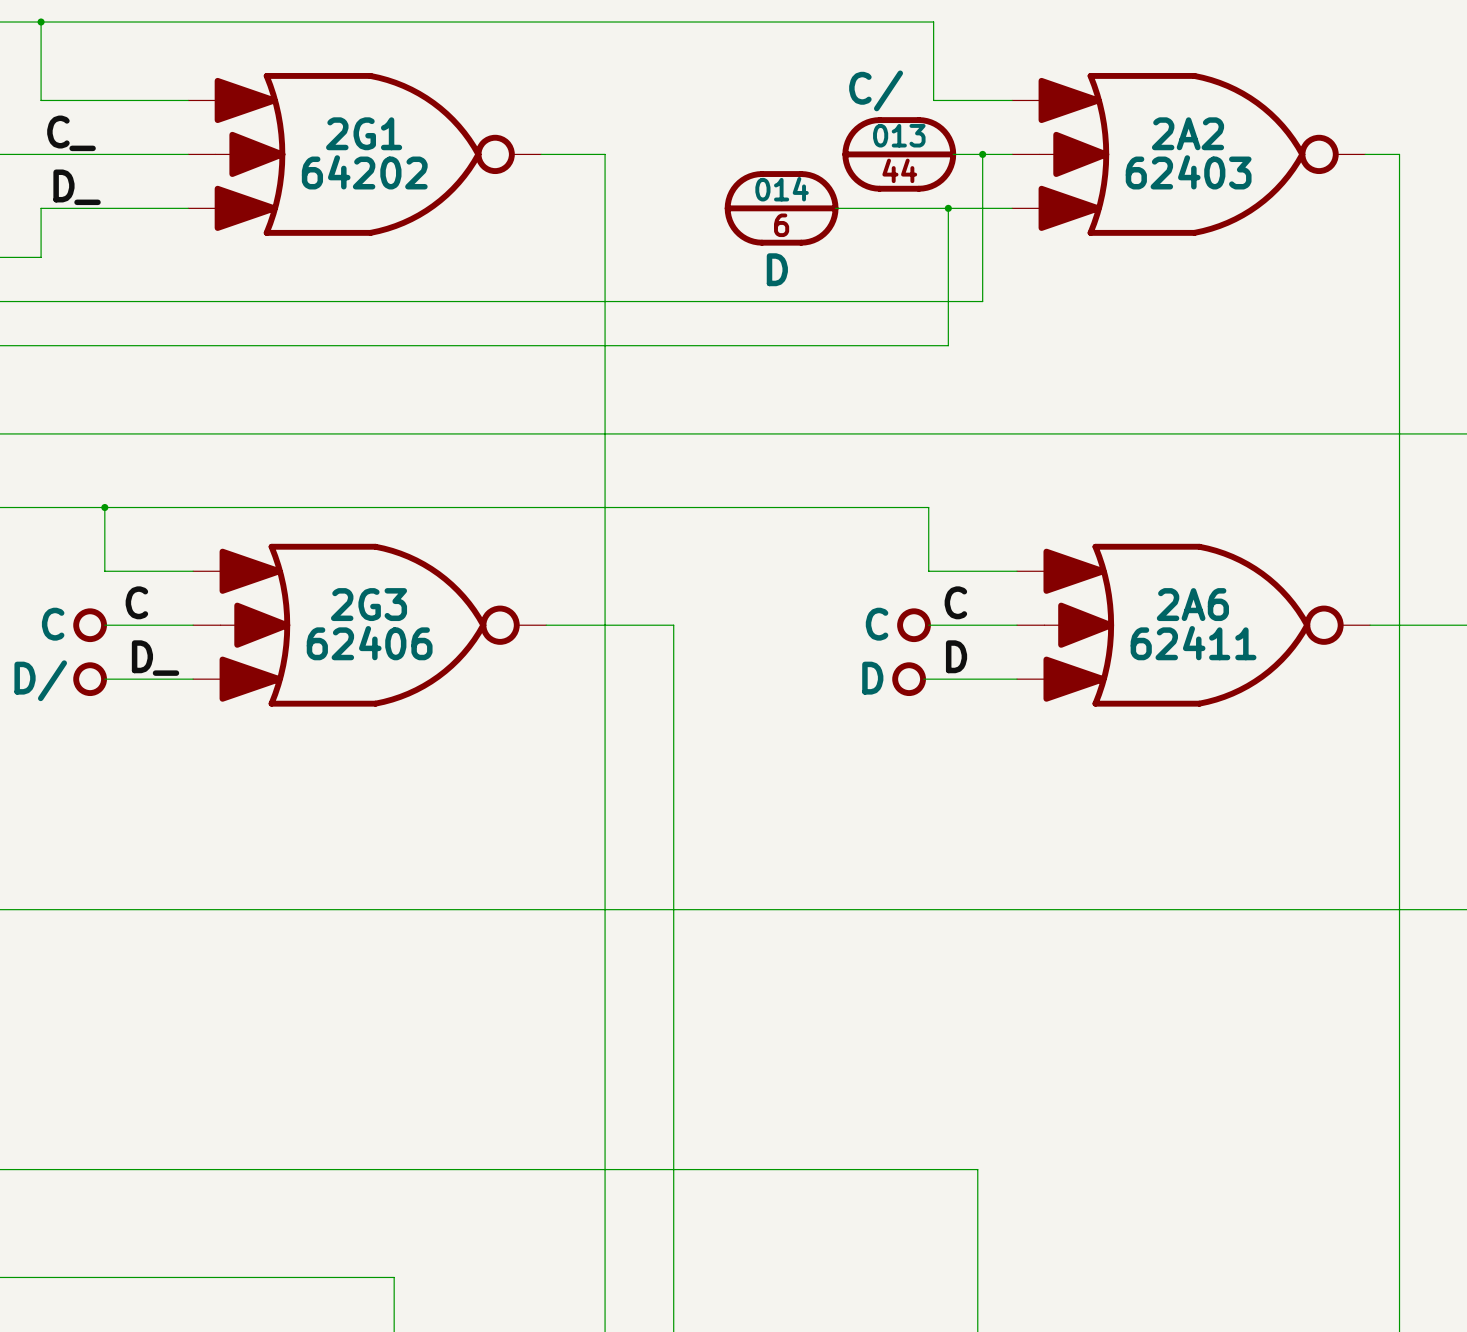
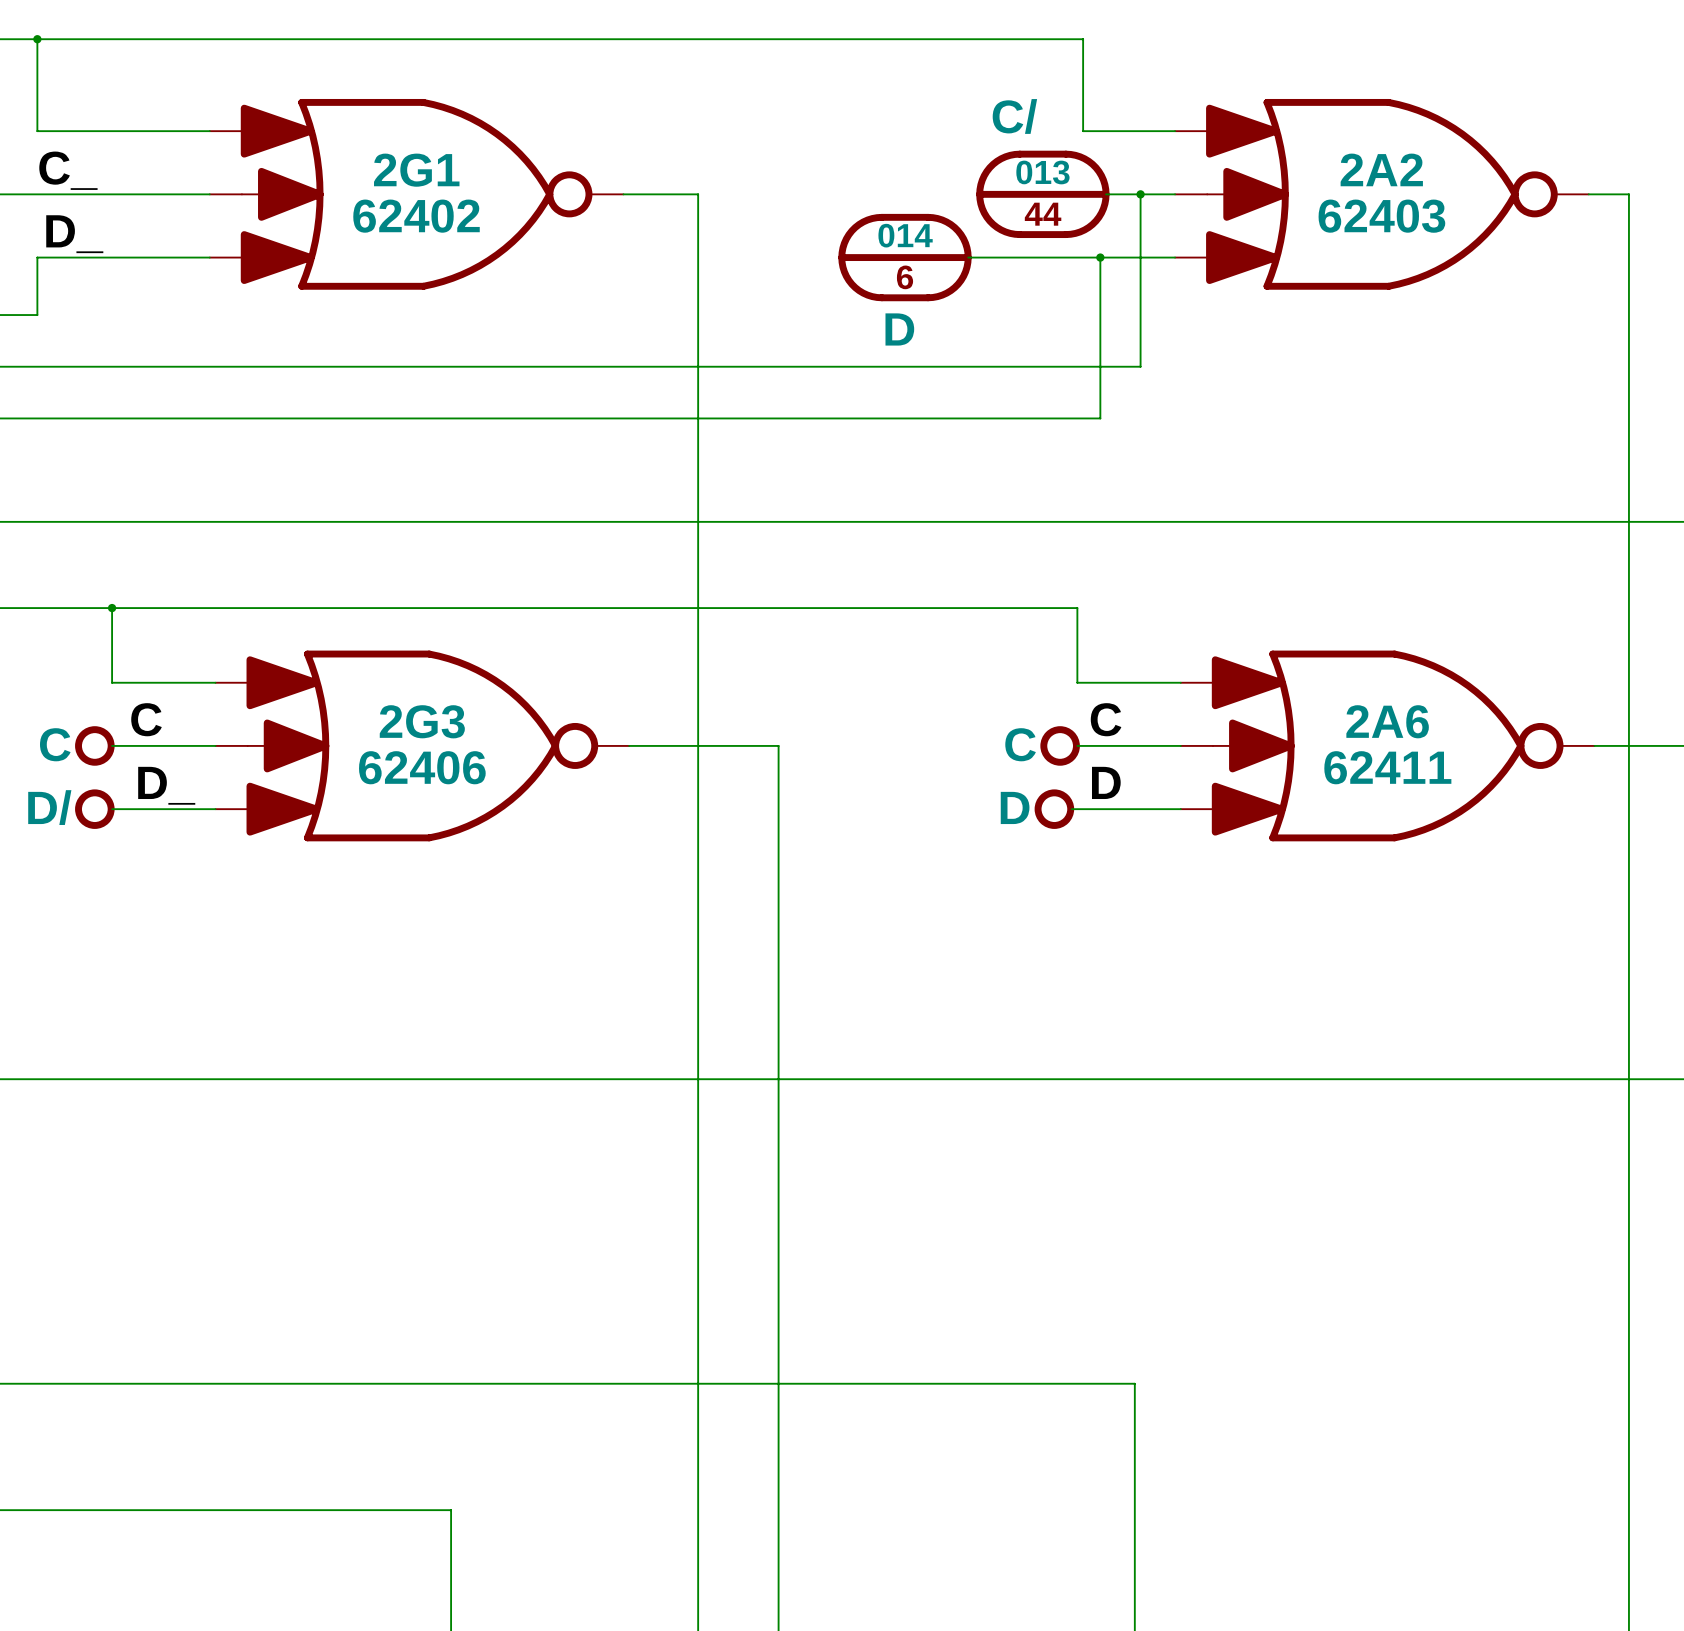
part text: 64202 (364, 172) -> 62402 (416, 216)

